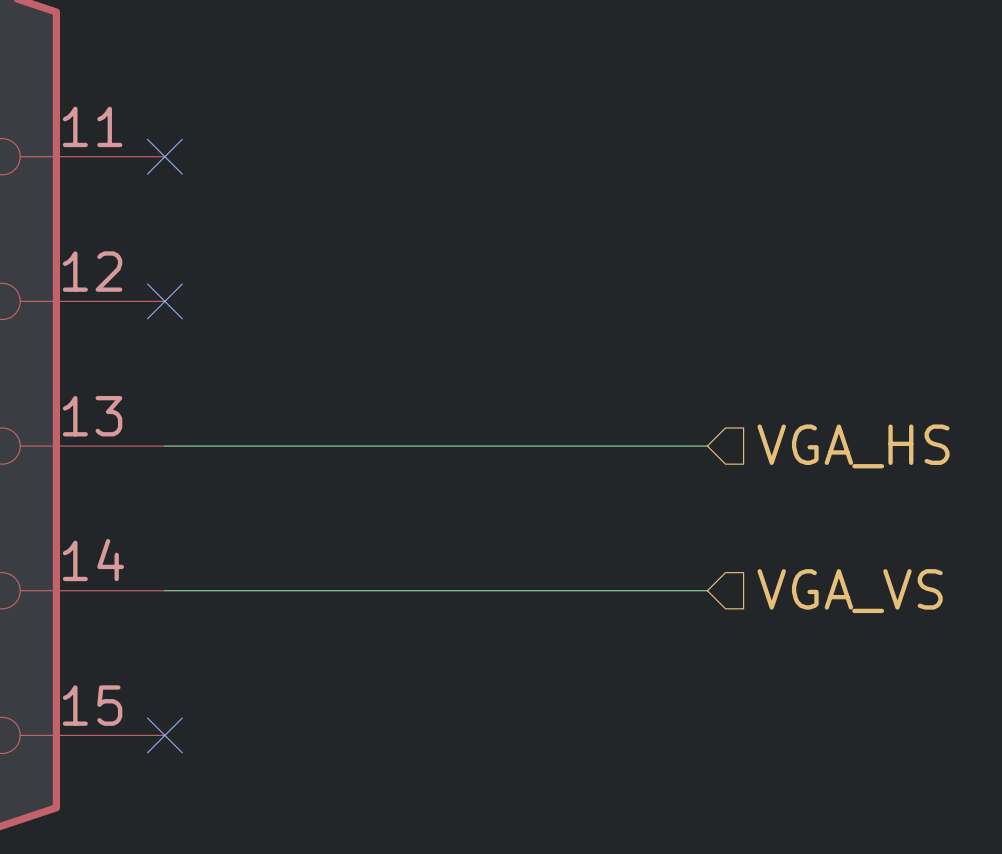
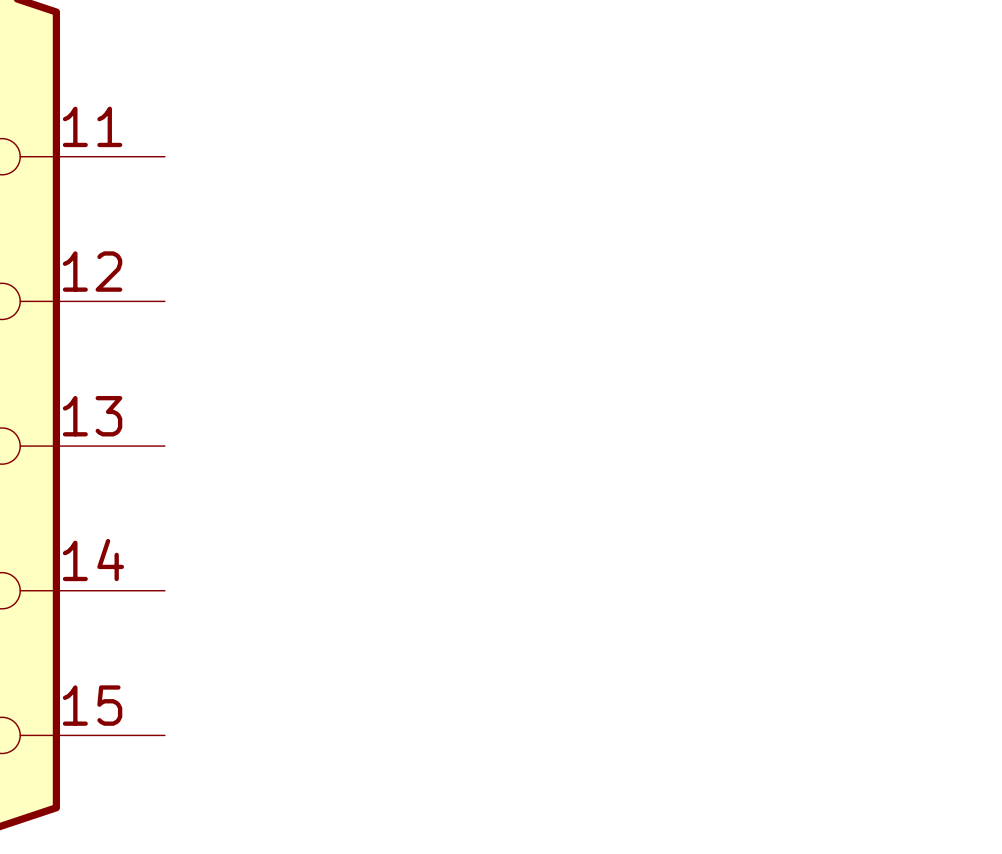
no-connect mark: (164, 156) -> none
no-connect mark: (164, 301) -> none
wire: (164, 446) (707, 446) -> none
hierarchical label: VGA_HS (853, 446) -> none
wire: (164, 590) (707, 590) -> none
hierarchical label: VGA_VS (850, 591) -> none
no-connect mark: (164, 735) -> none

